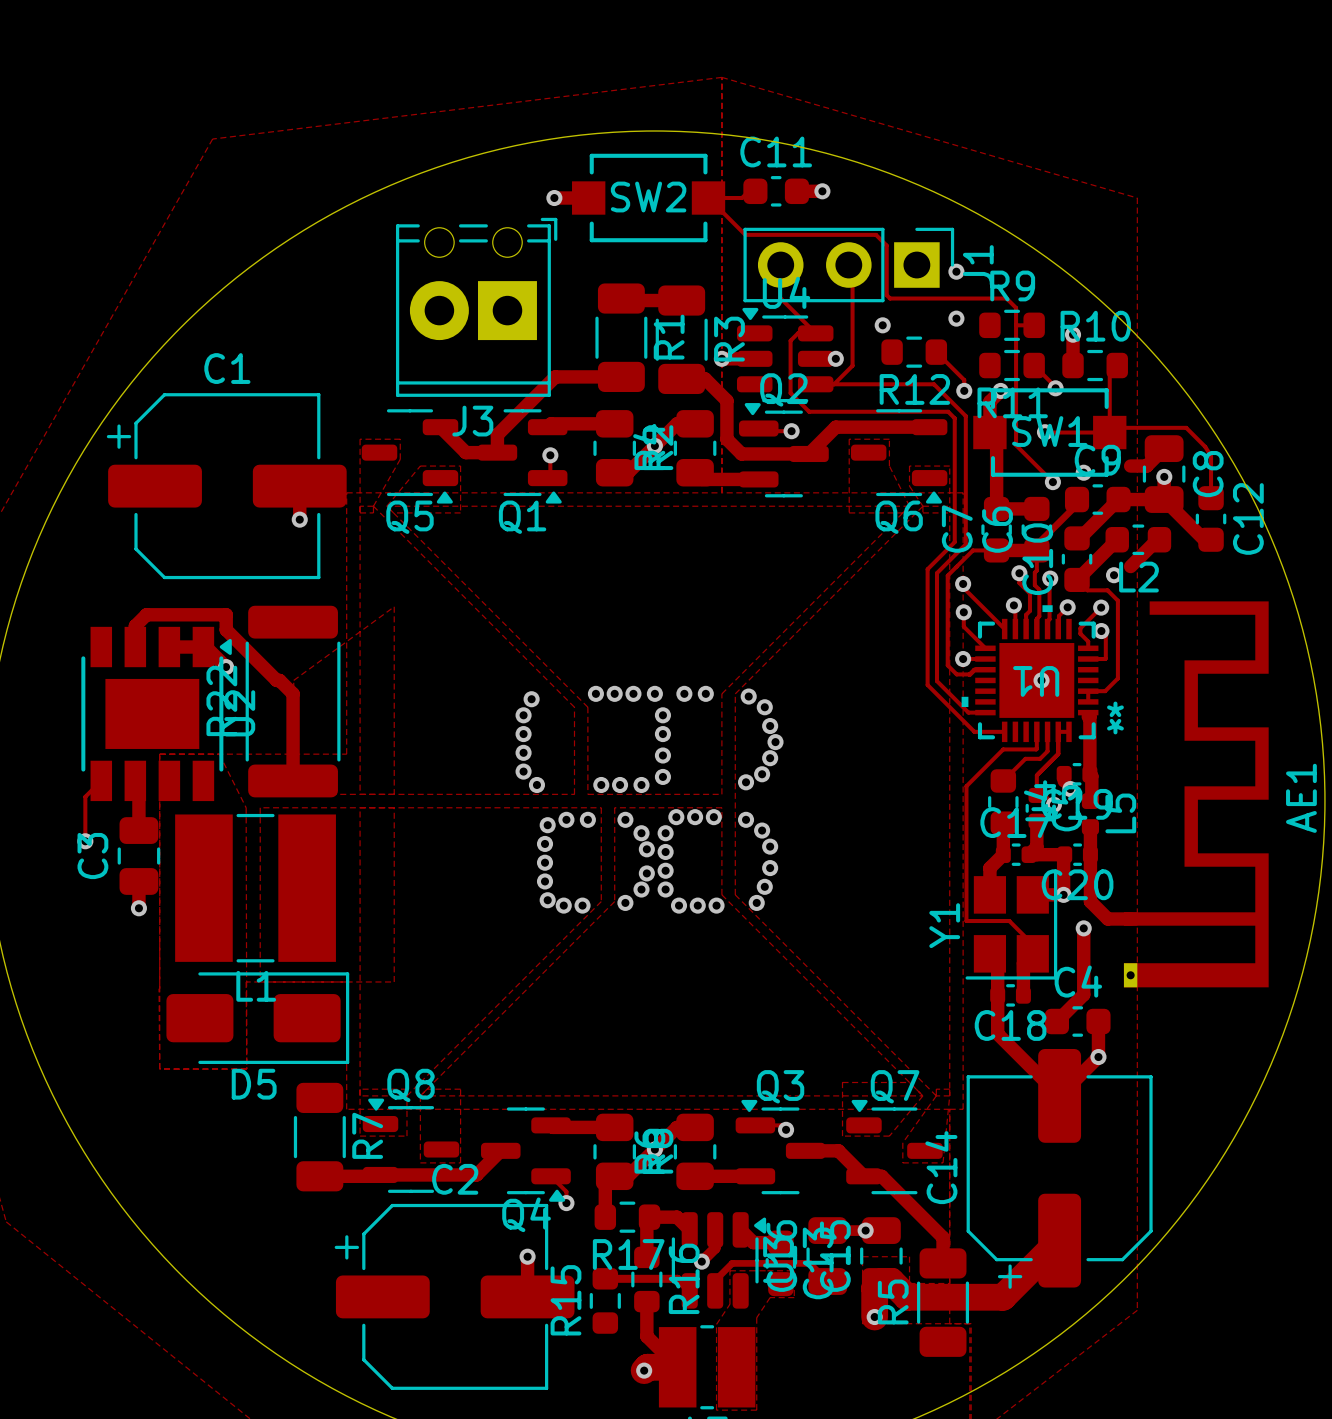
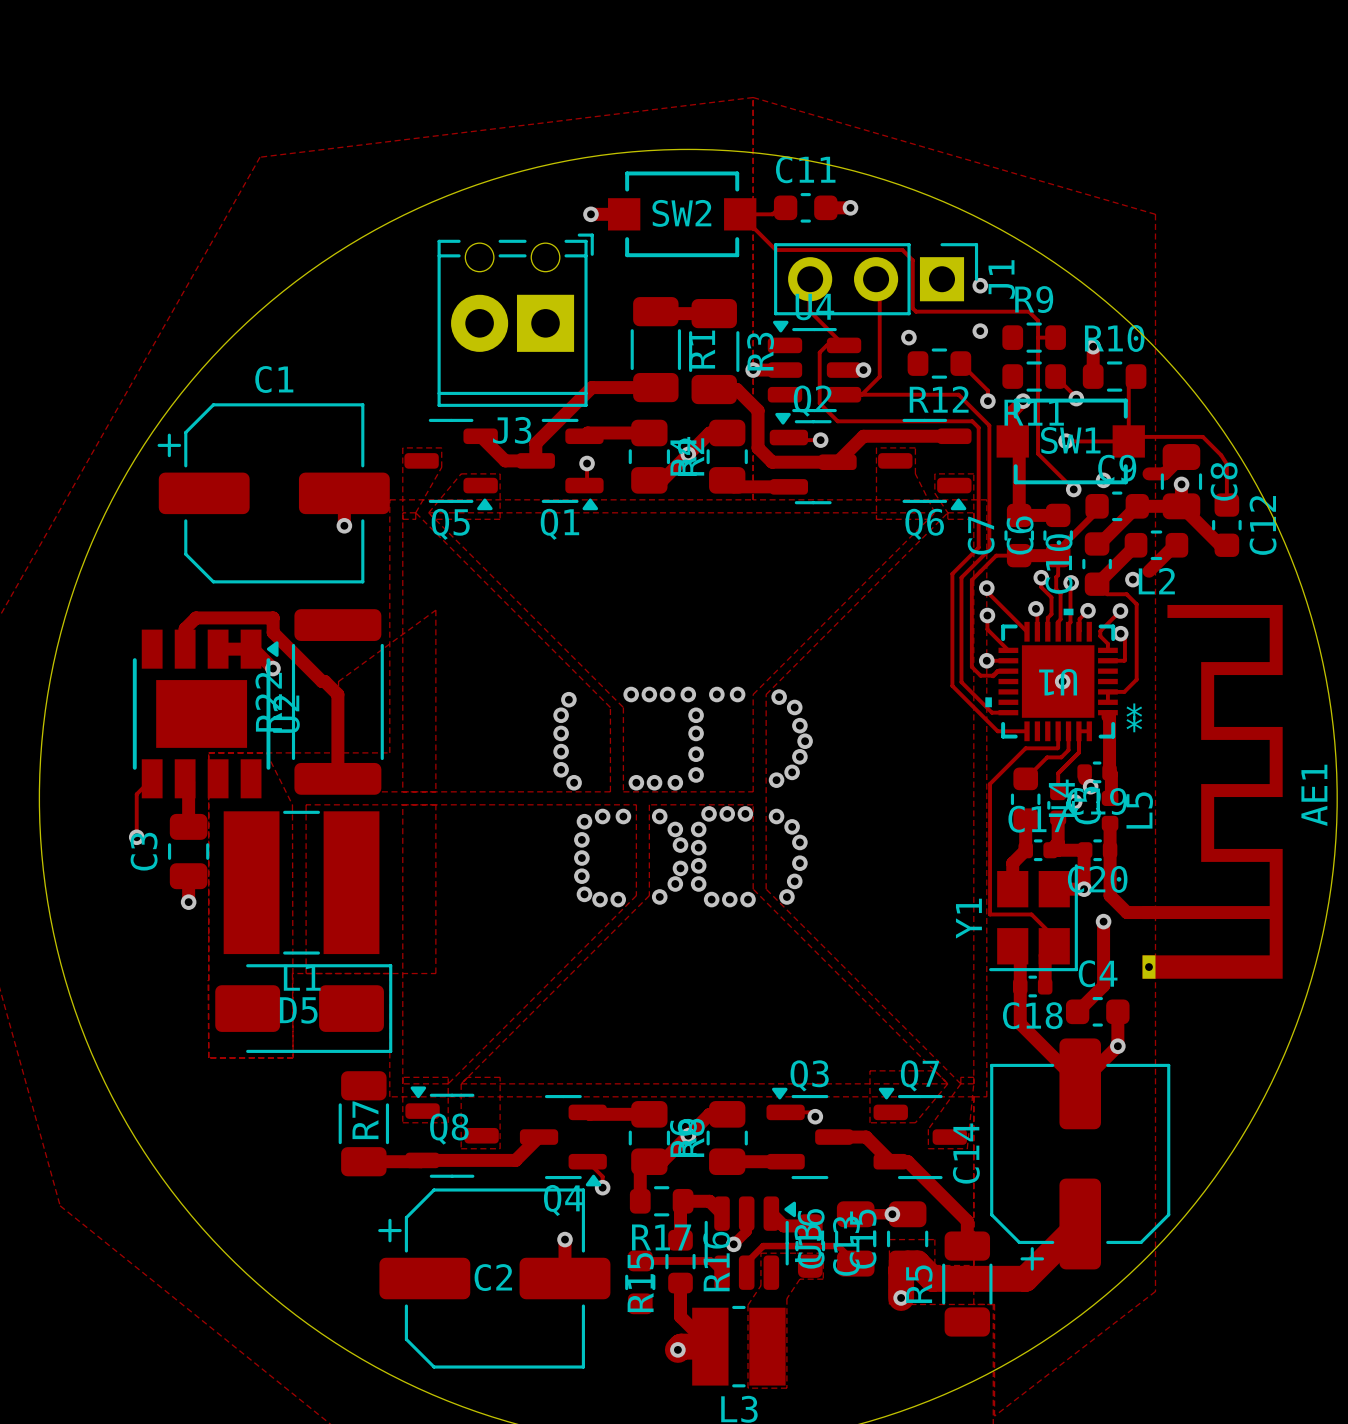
D5 name position: D5 (254, 1084) -> D5 (298, 1010)
Q8 name position: Q8 (410, 1085) -> Q8 (449, 1129)
R7 name position: R7 (367, 1135) -> R7 (365, 1120)
C2 name position: C2 (455, 1179) -> C2 (493, 1277)
R15 name position: R15 (565, 1300) -> R15 (640, 1282)

